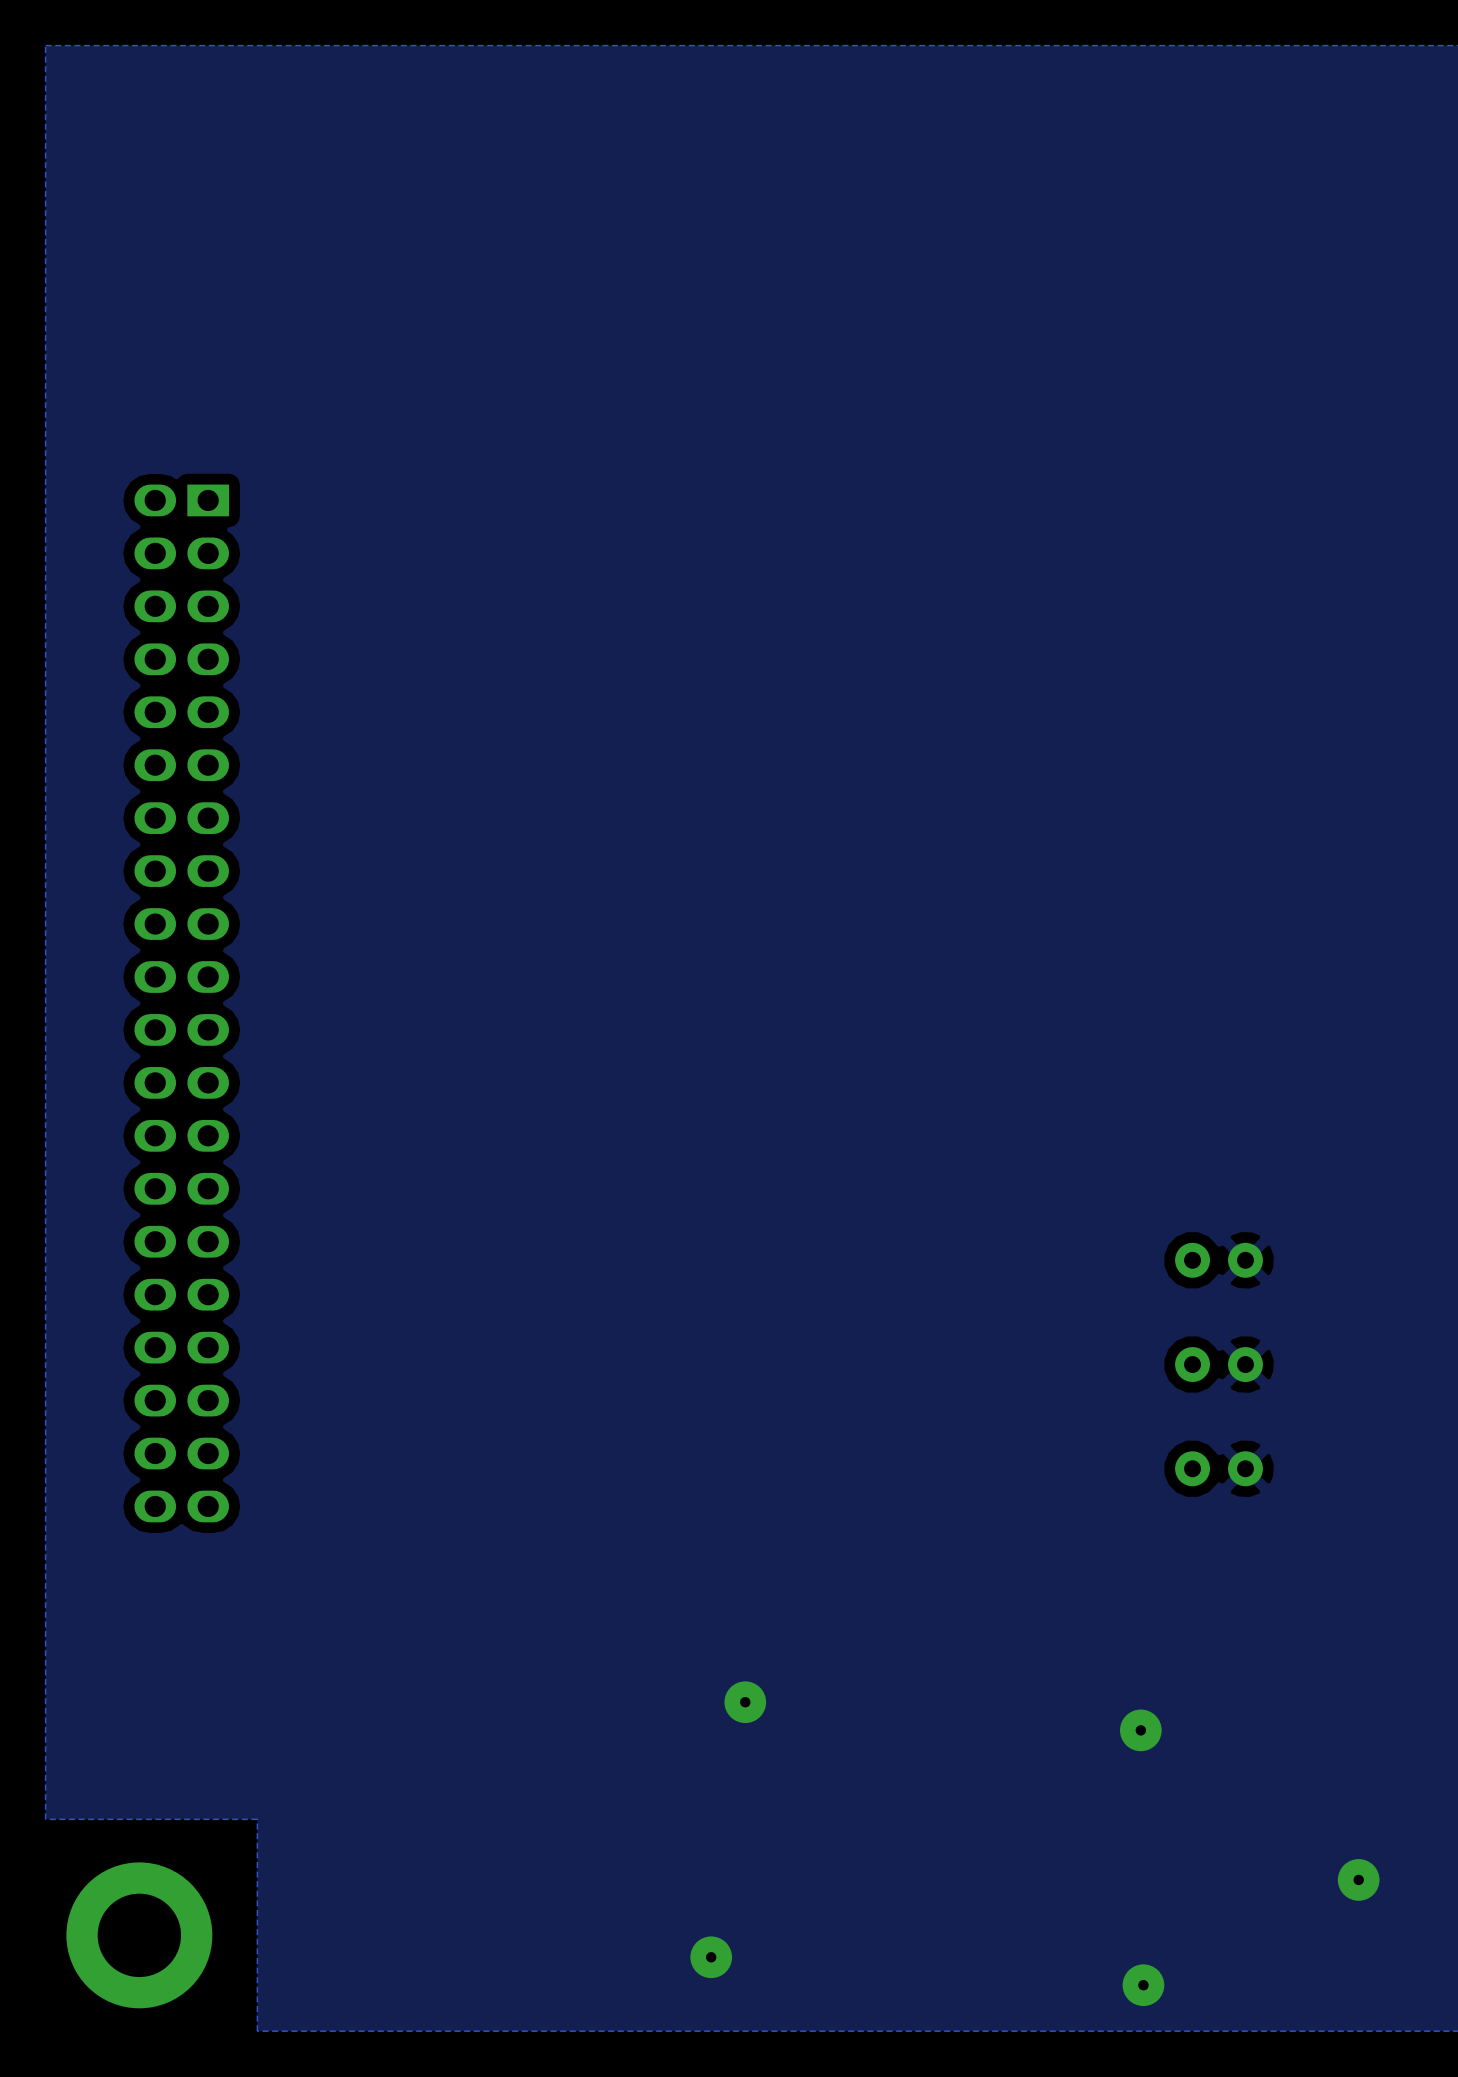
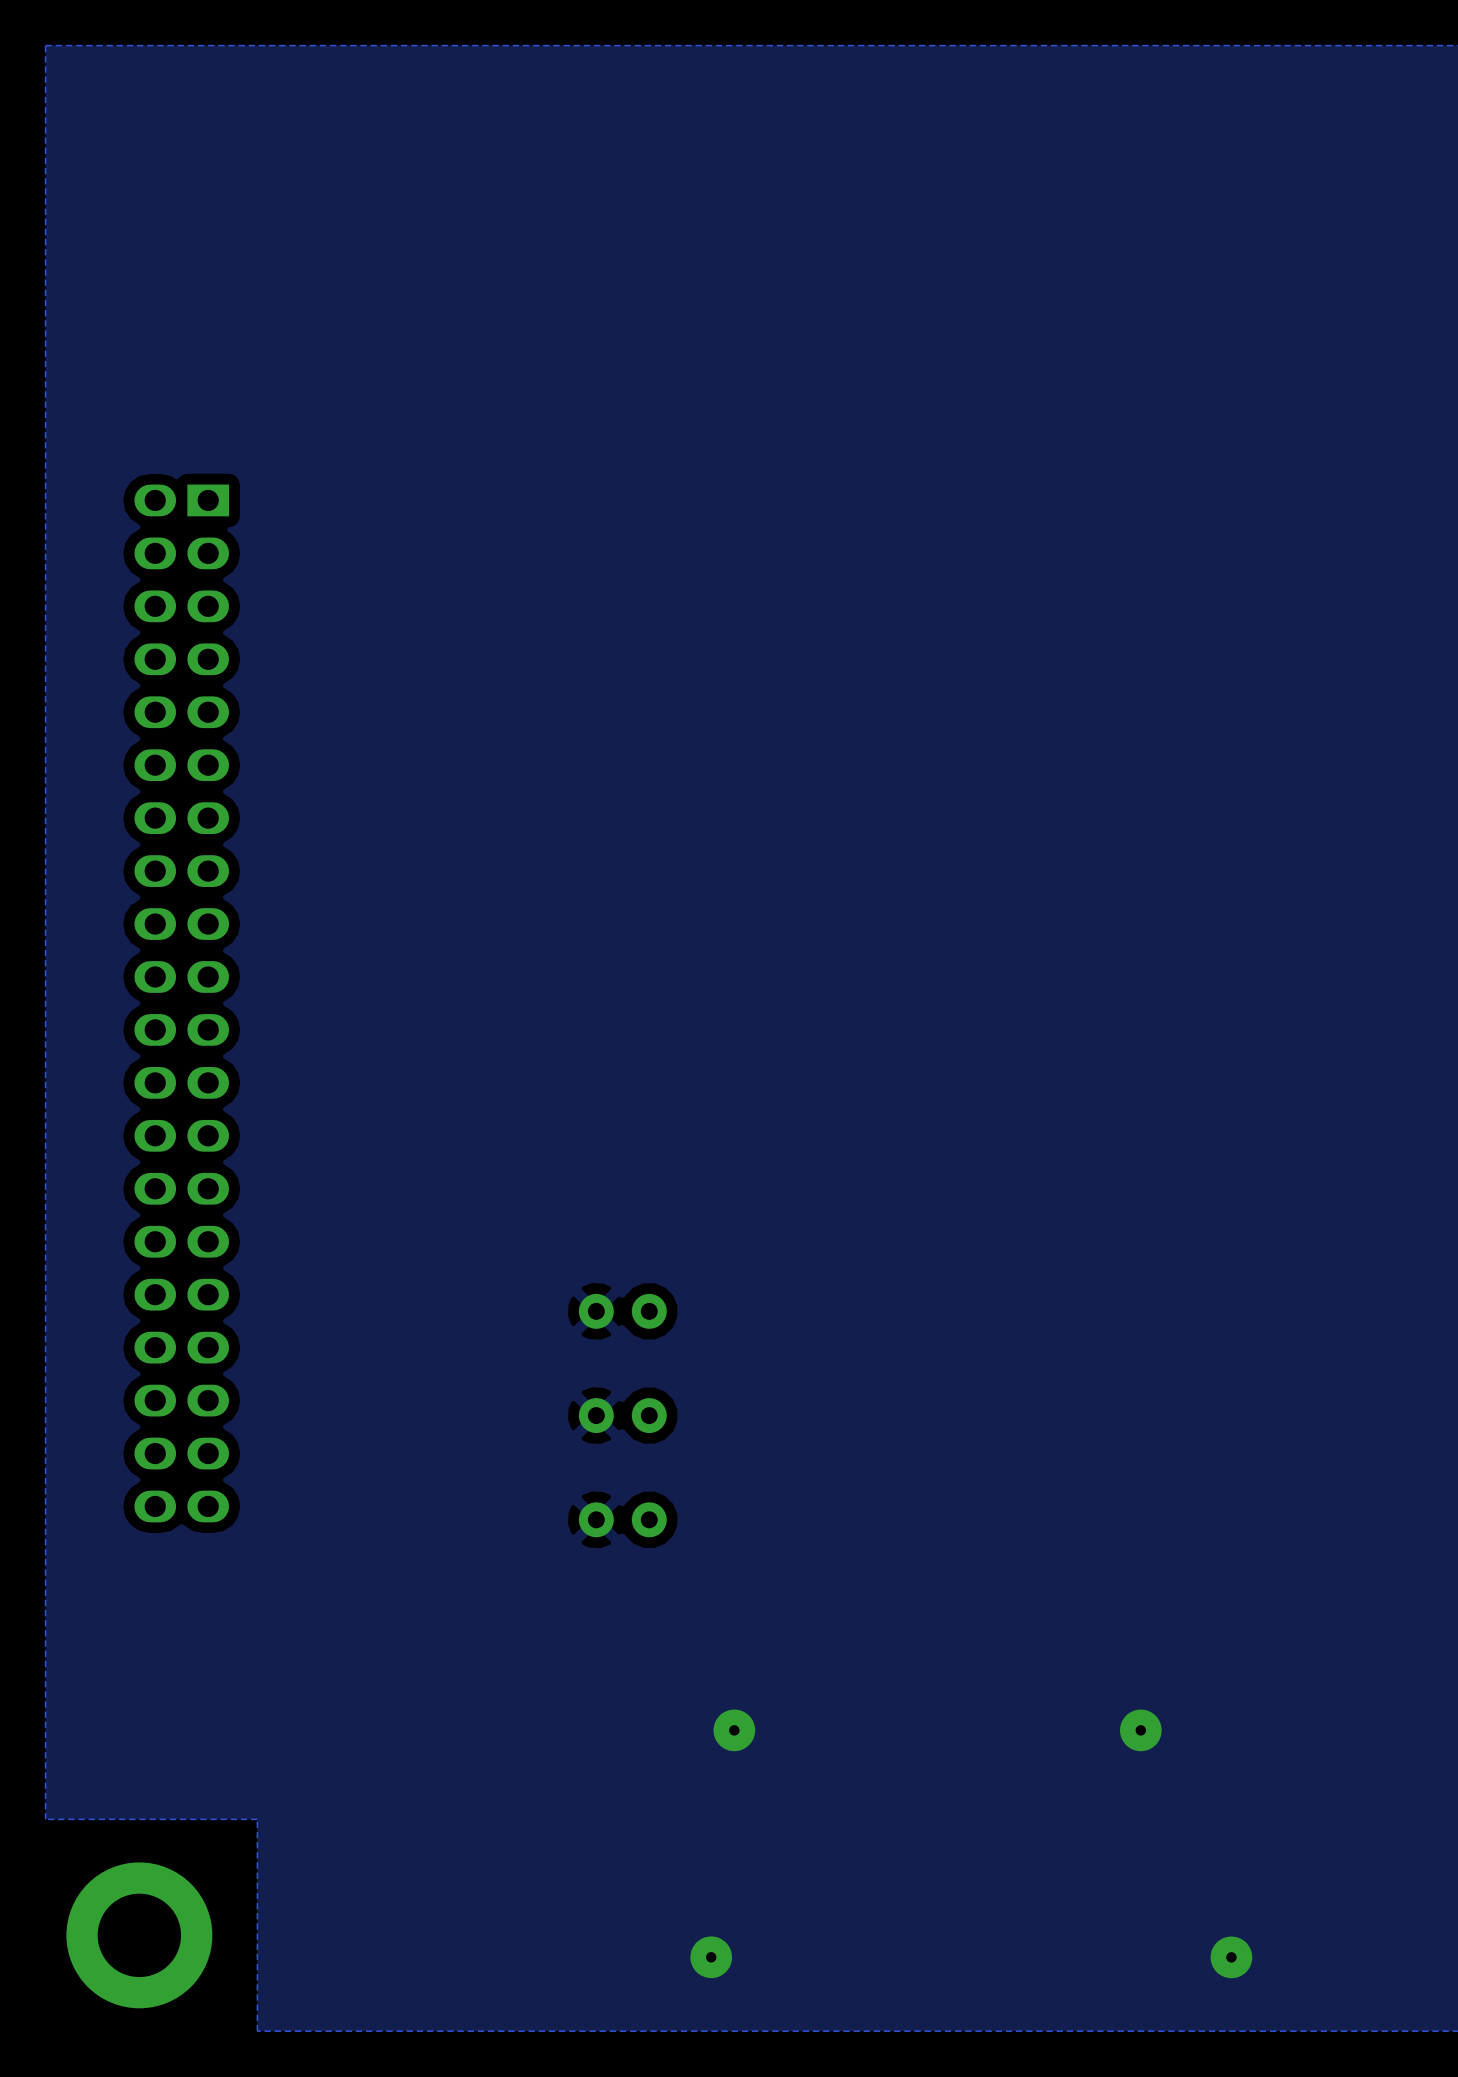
part: (1219, 1260) -> none
part: none -> (622, 1311)
part: (1219, 1364) -> none
part: none -> (622, 1415)
part: (1219, 1468) -> none
part: none -> (622, 1519)
via position: (745, 1702) -> (734, 1730)
via: (1358, 1879) -> none
via: none -> (1231, 1957)
via: (1143, 1985) -> none

